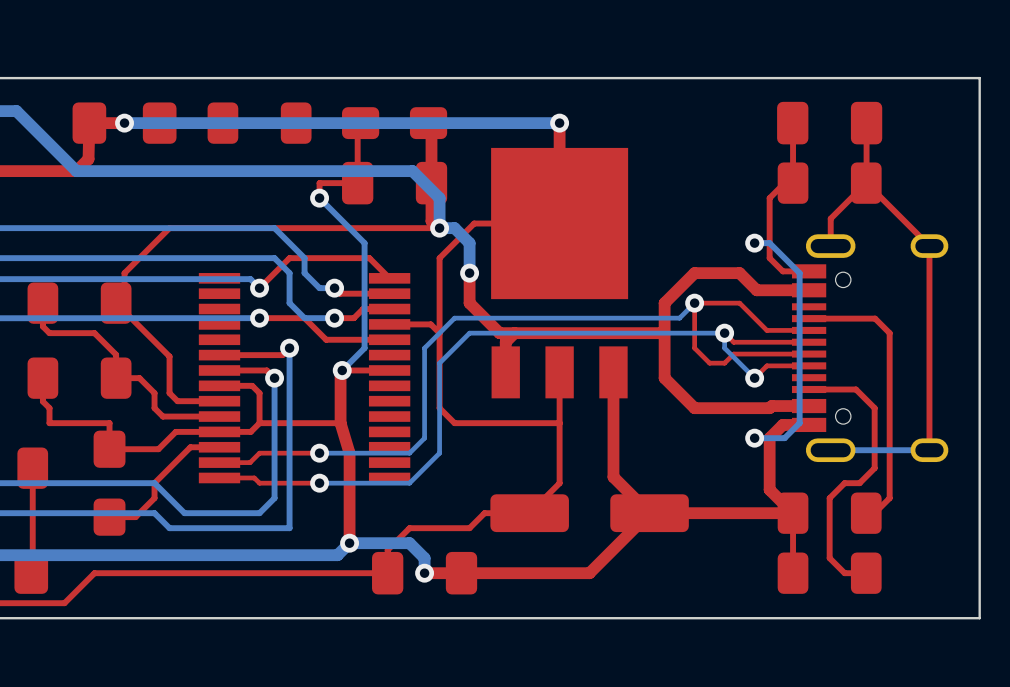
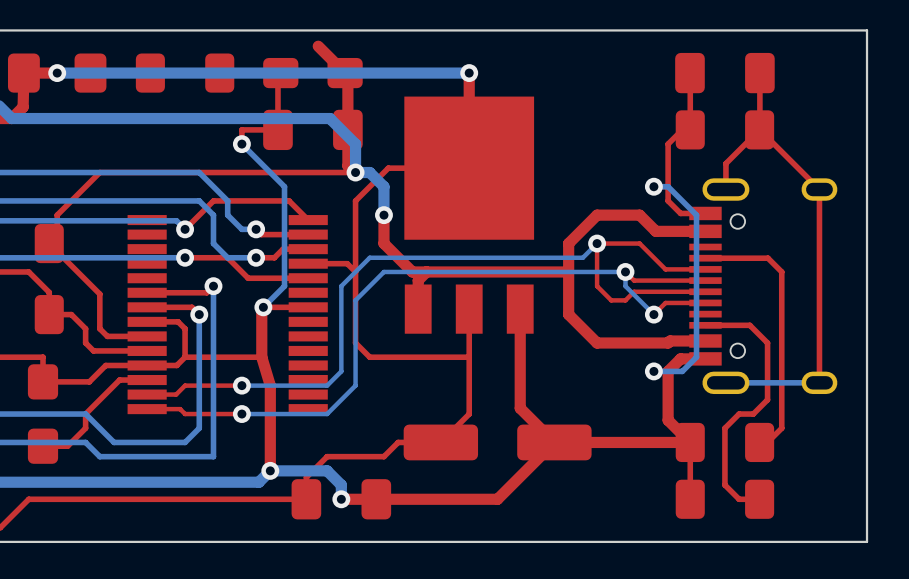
top track: none -> (318, 46) (345, 73)

